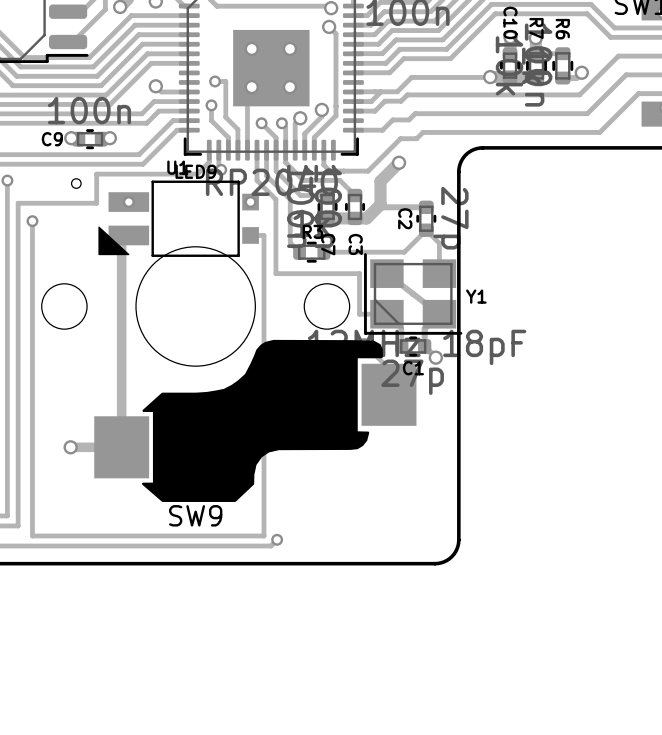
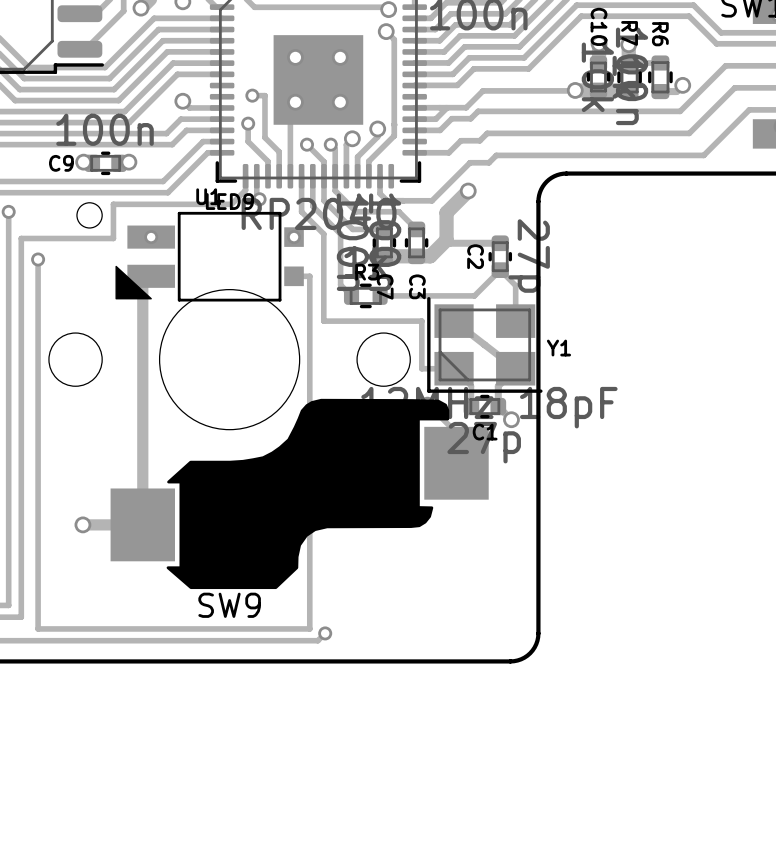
SW9 footprint: [41, 178, 417, 502] -> [48, 202, 489, 590]

